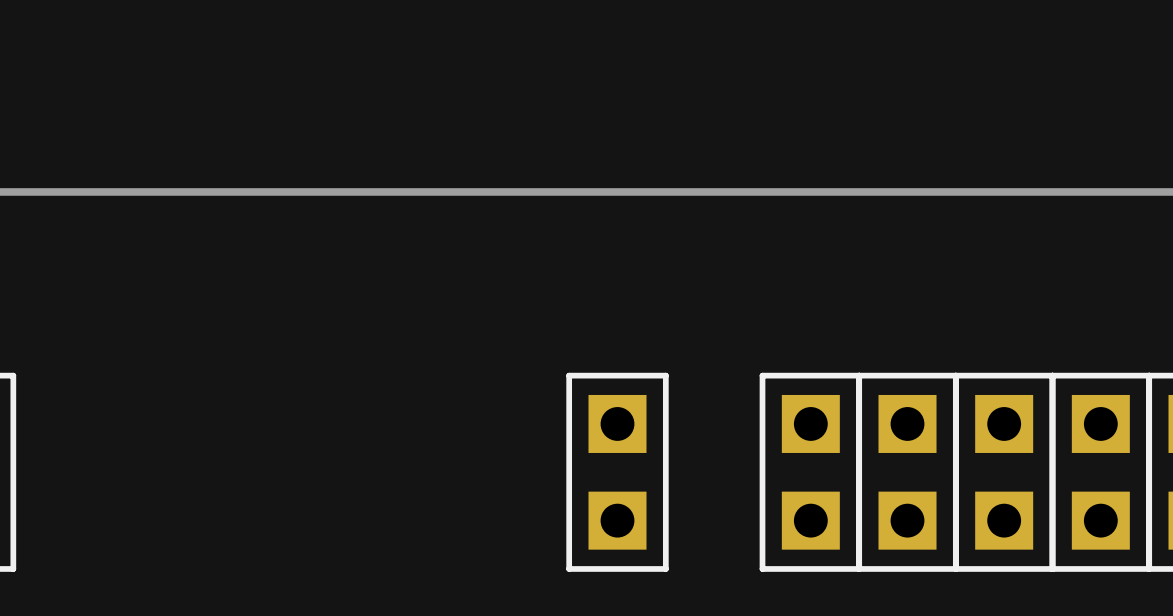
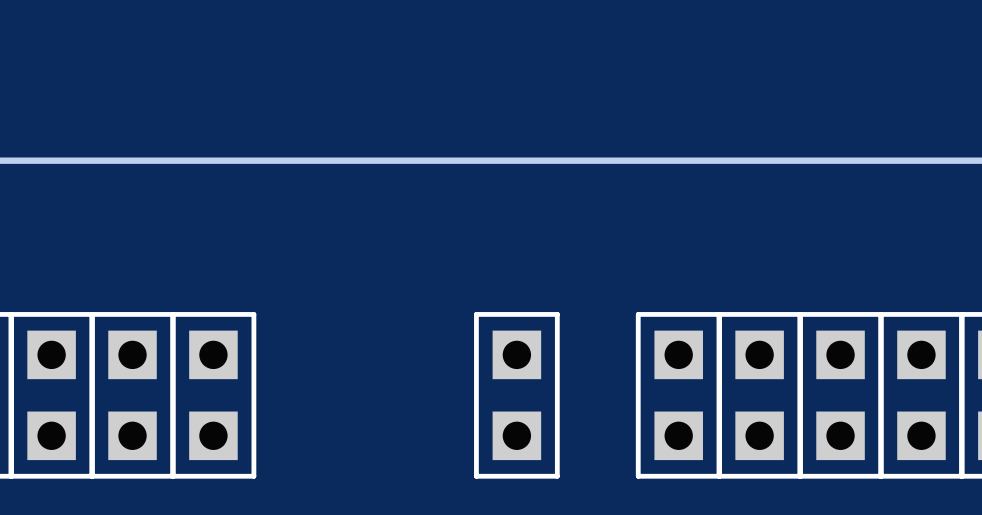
part: none -> (51, 395)
part: none -> (132, 395)
part: none -> (213, 395)

